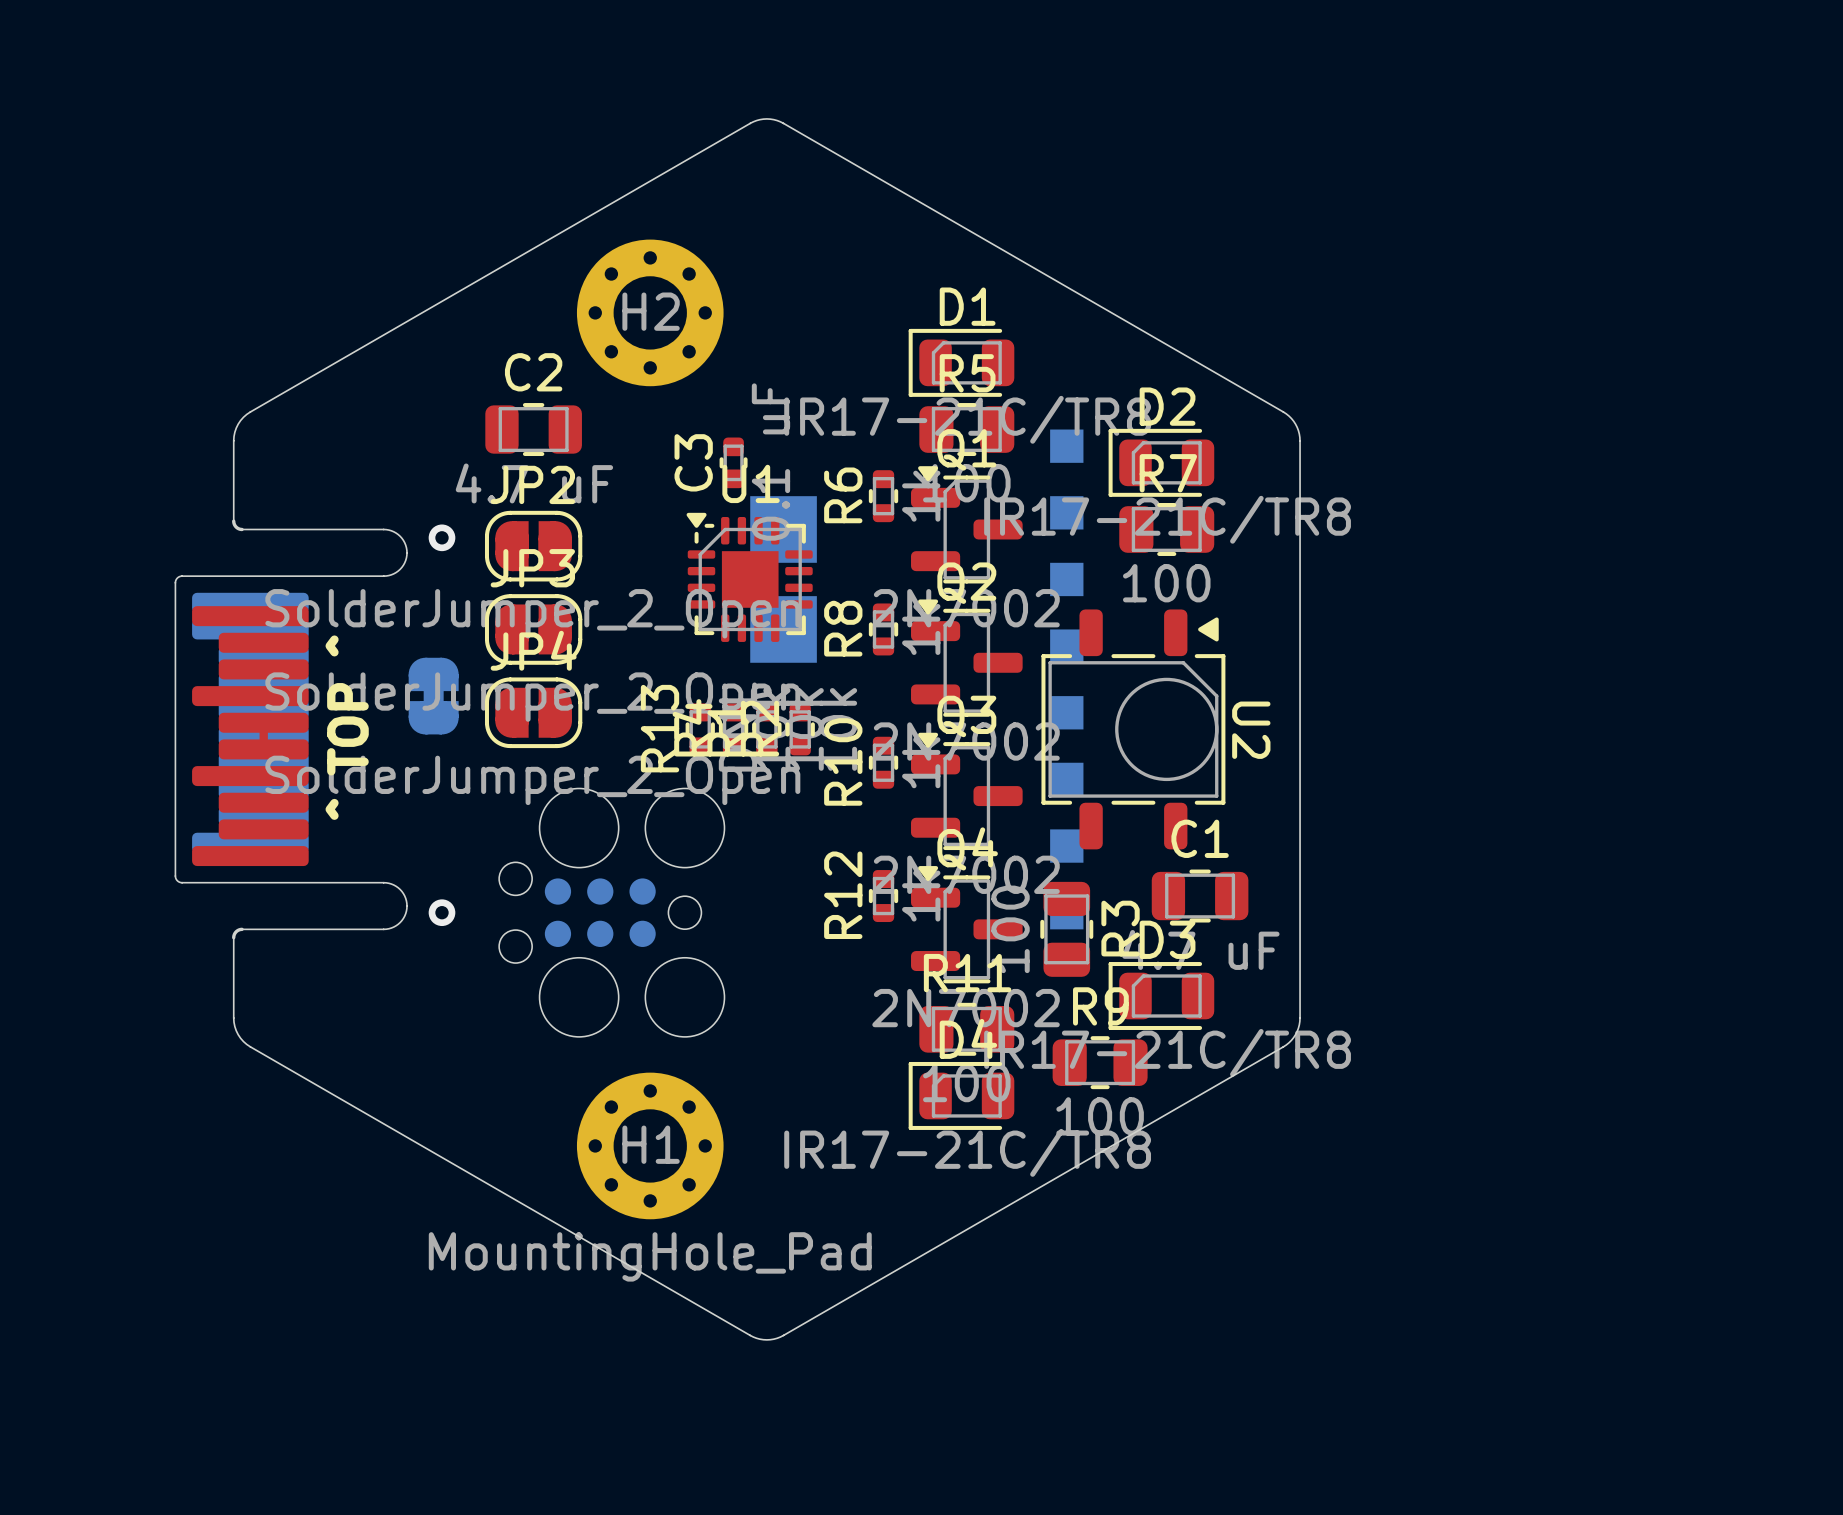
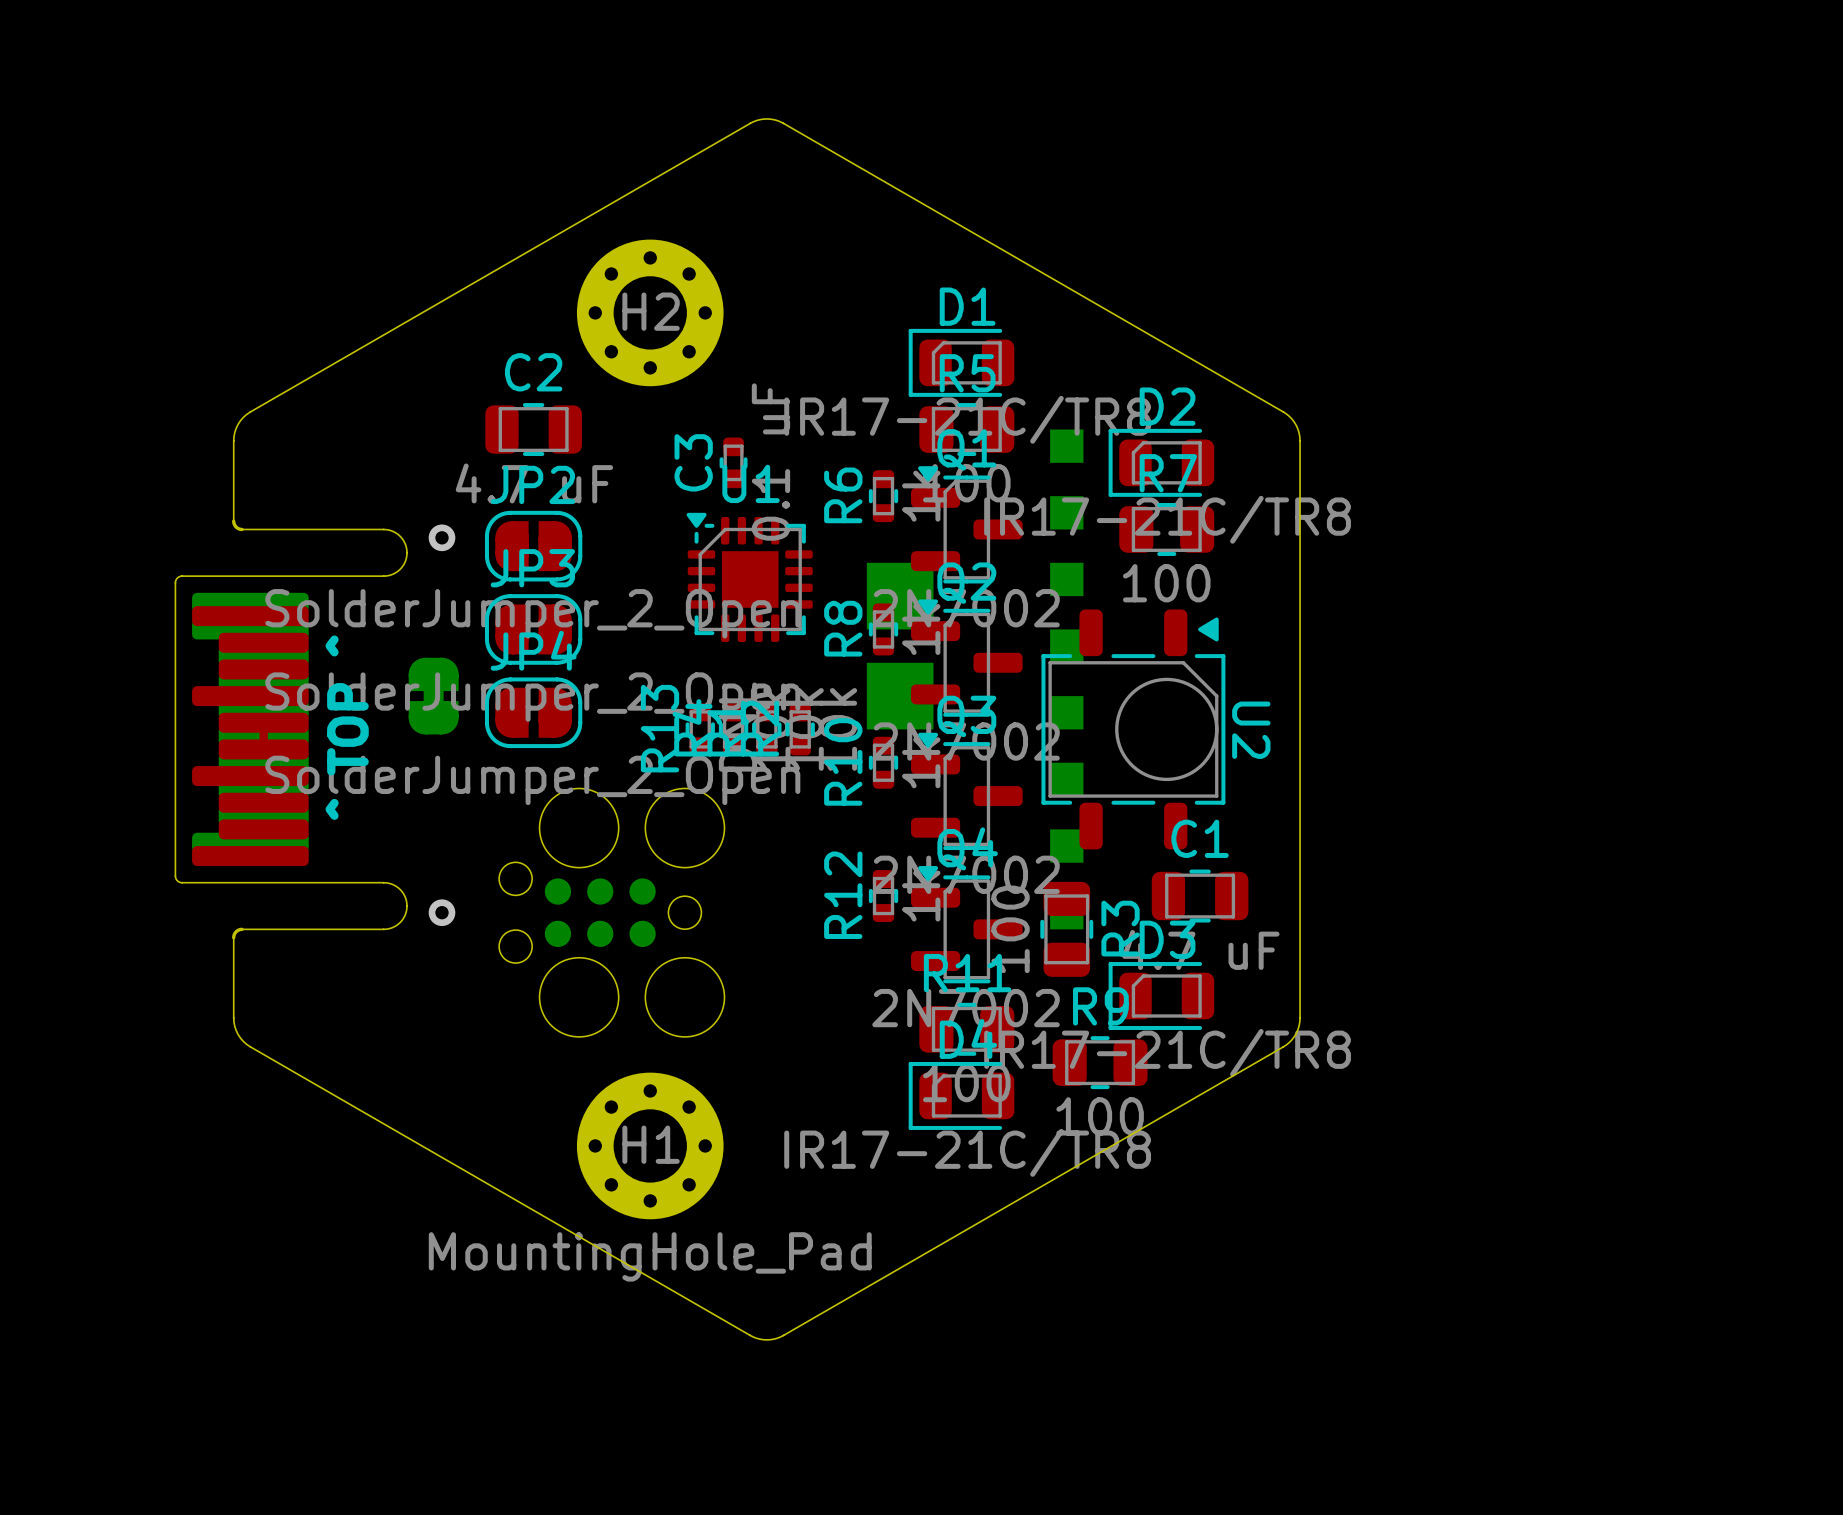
part: (783, 529) -> none
part: none -> (900, 596)
part: (783, 629) -> none
part: none -> (900, 696)

